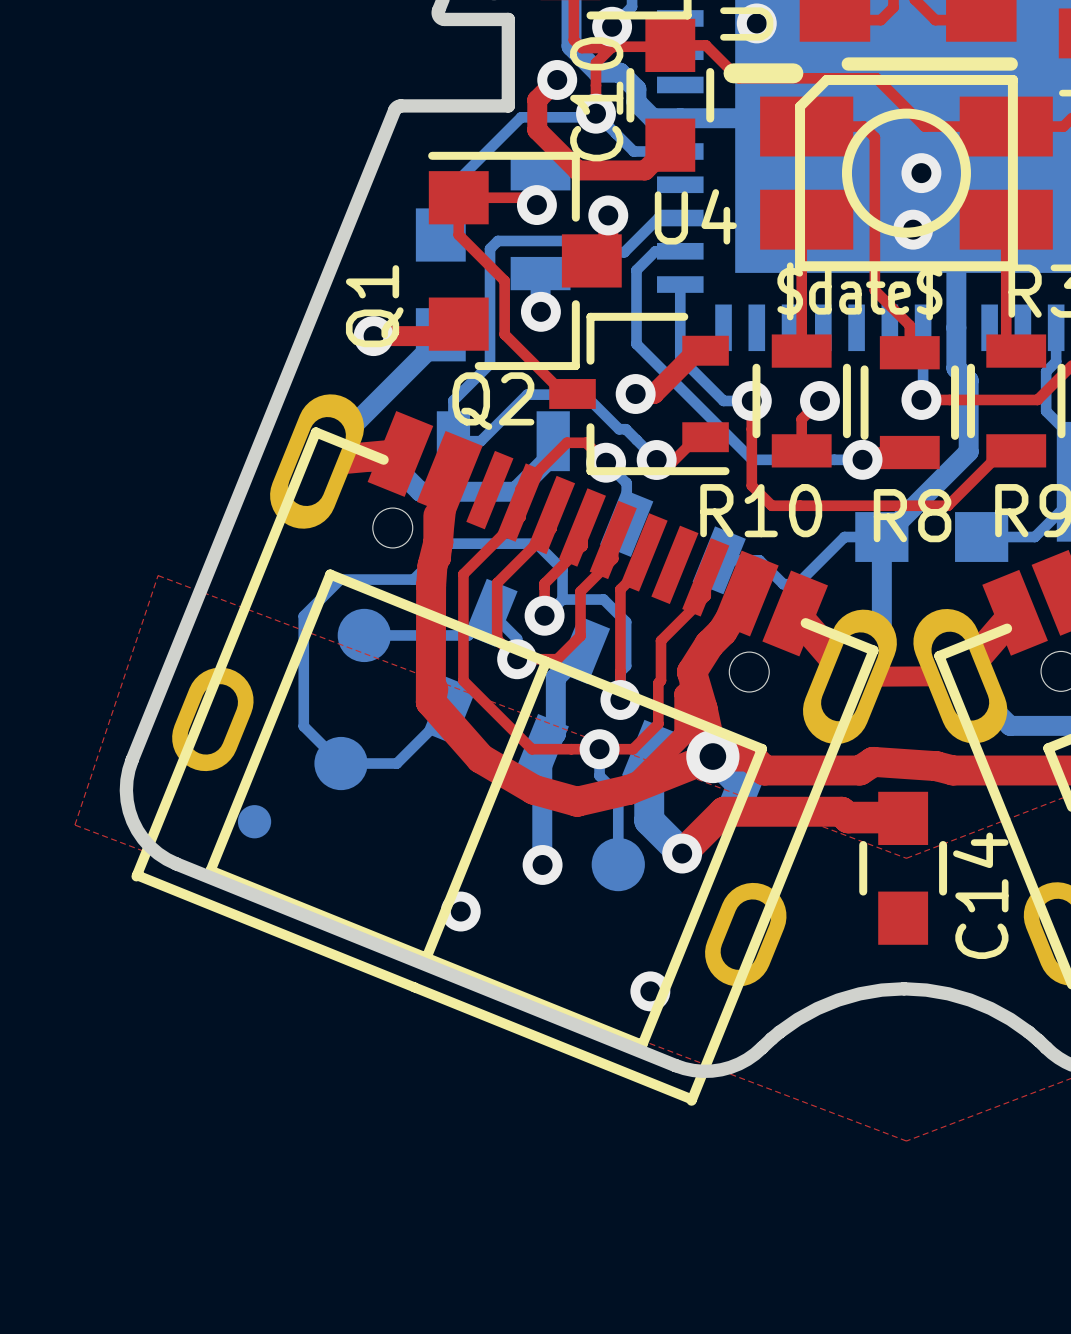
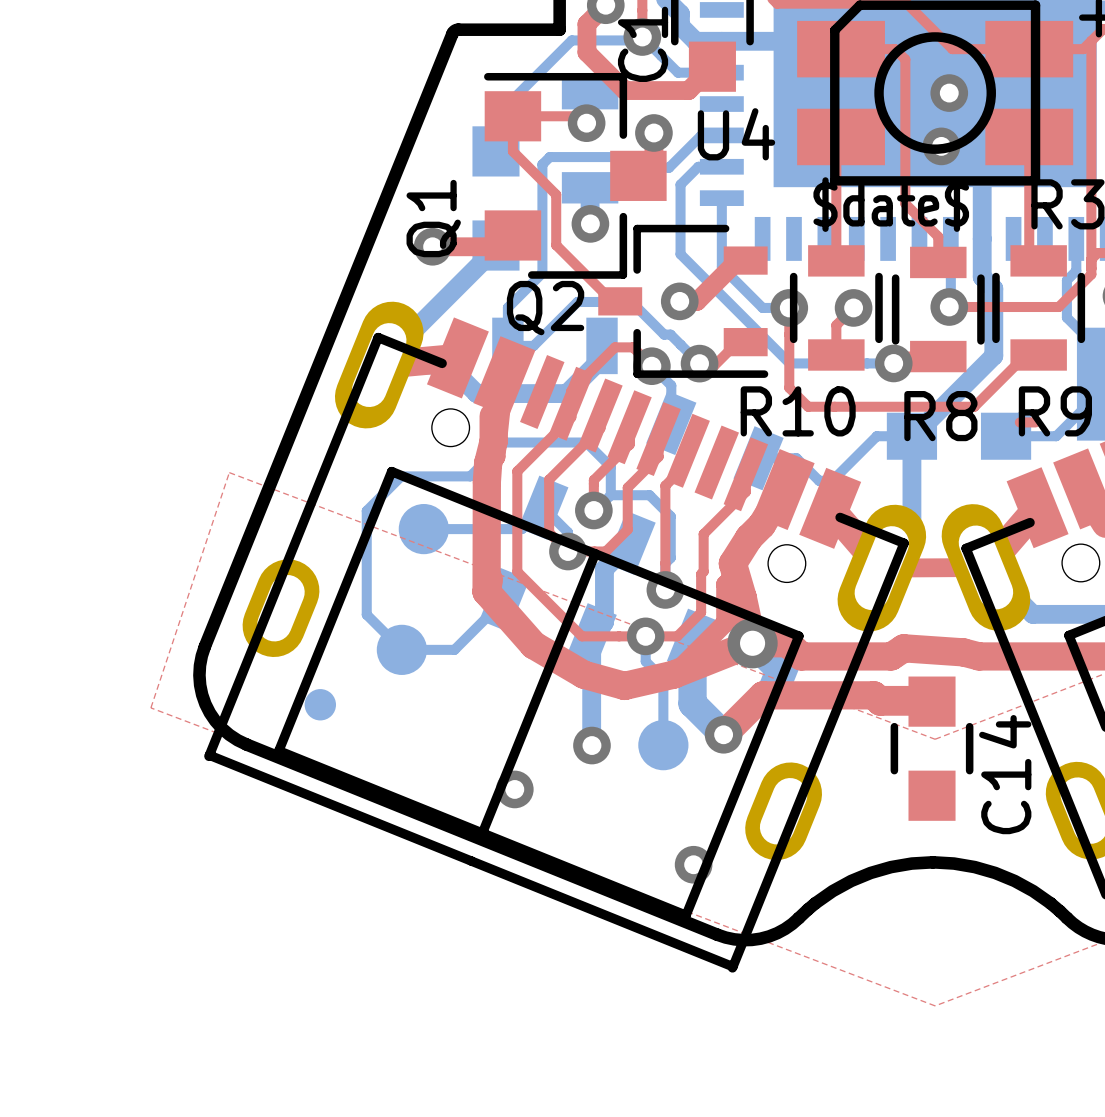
top track: none -> (1019, 422) (1035, 422)

